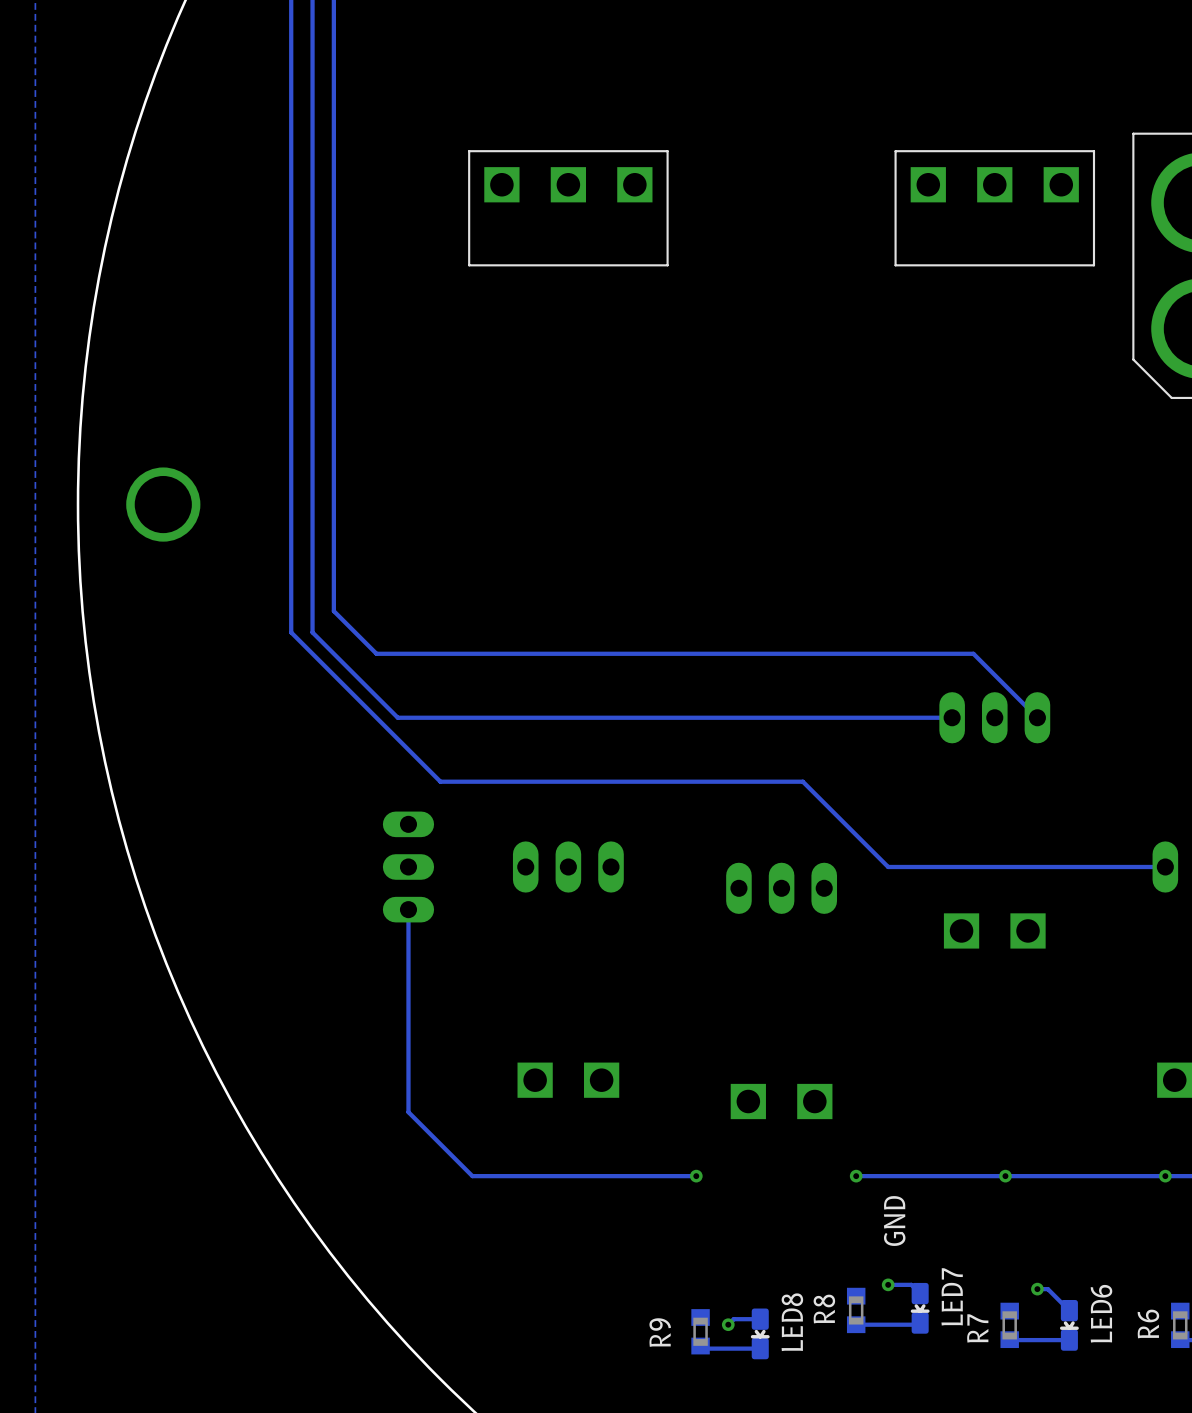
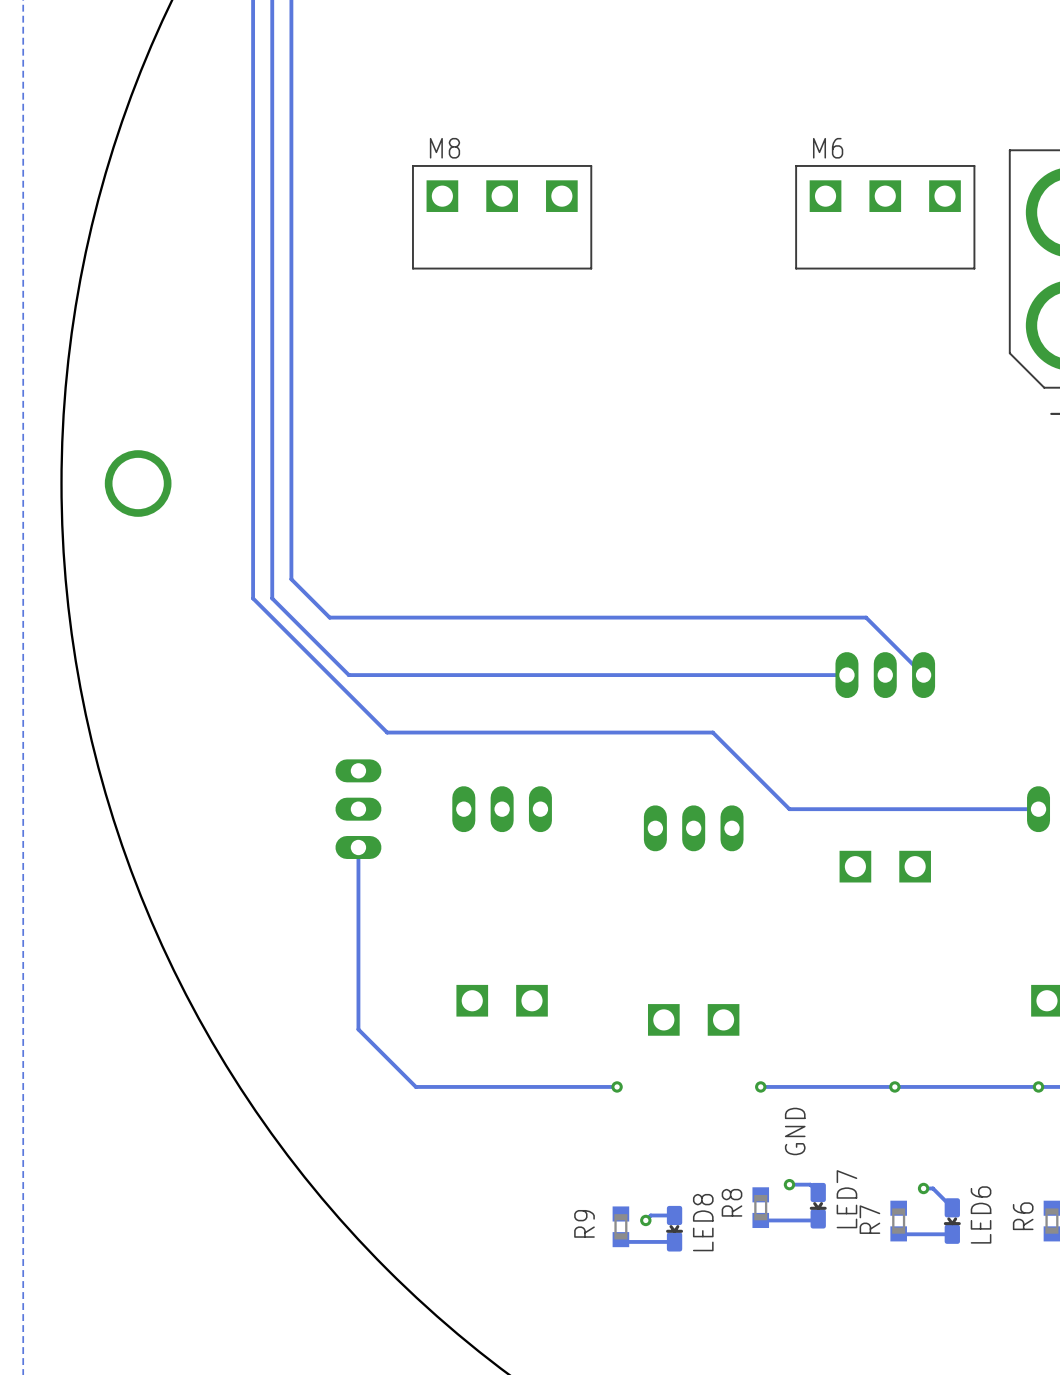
M8 name: none -> M8 (444, 148)
M6 name: none -> M6 (828, 148)

